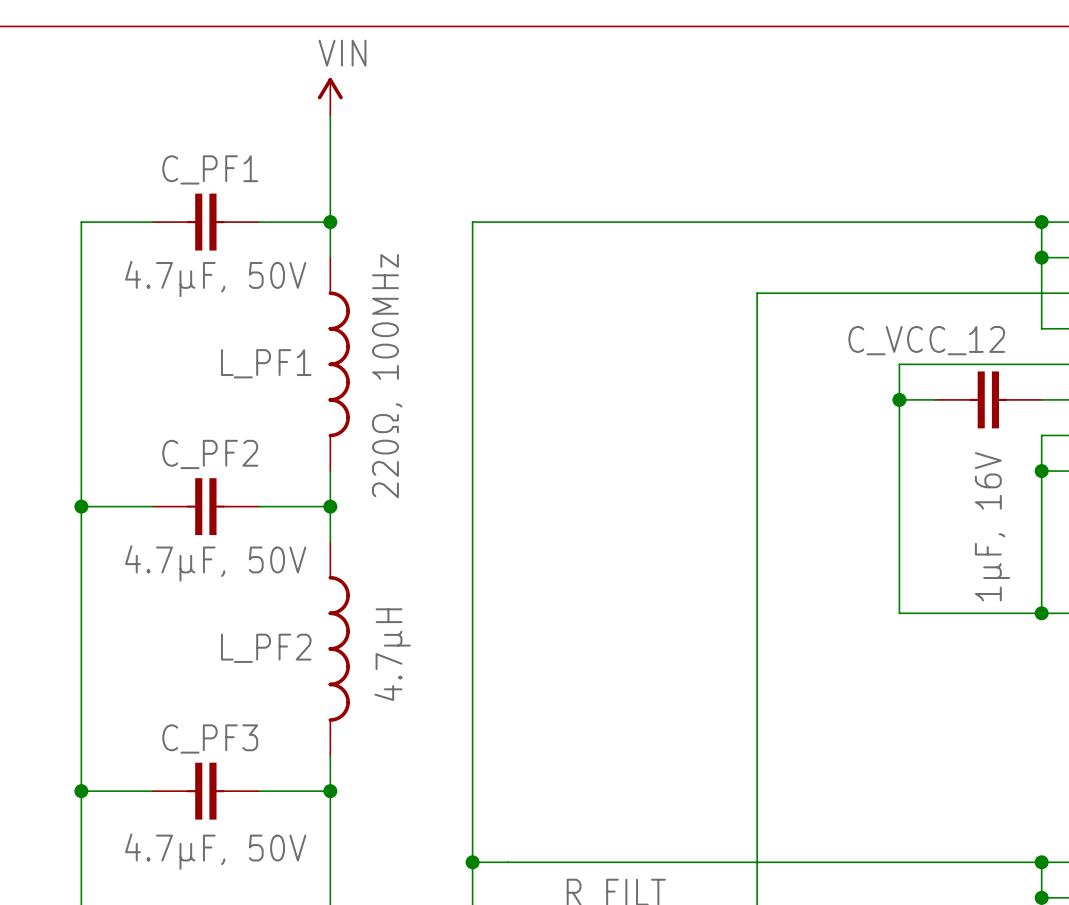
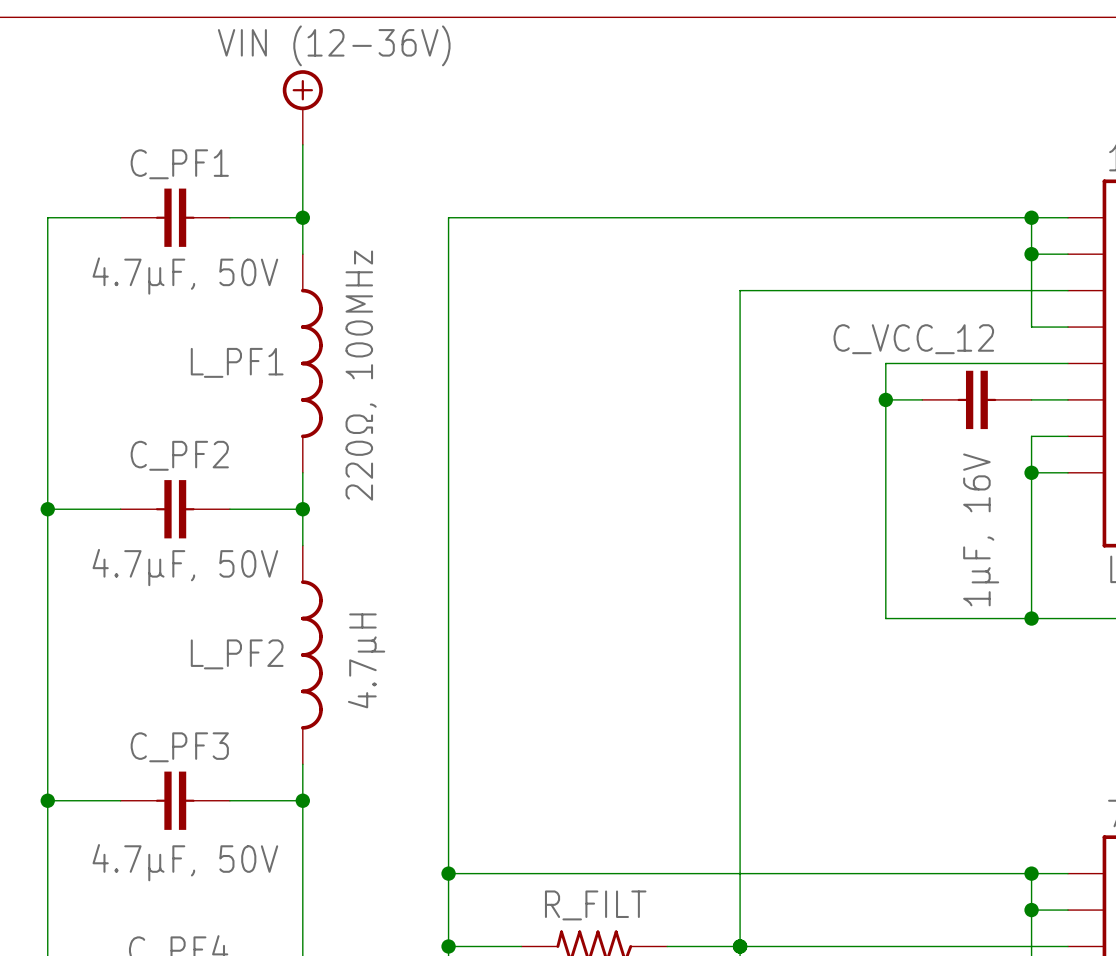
power symbol: VIN (330, 96) -> none
power symbol: none -> VIN (12-36V) (302, 107)

